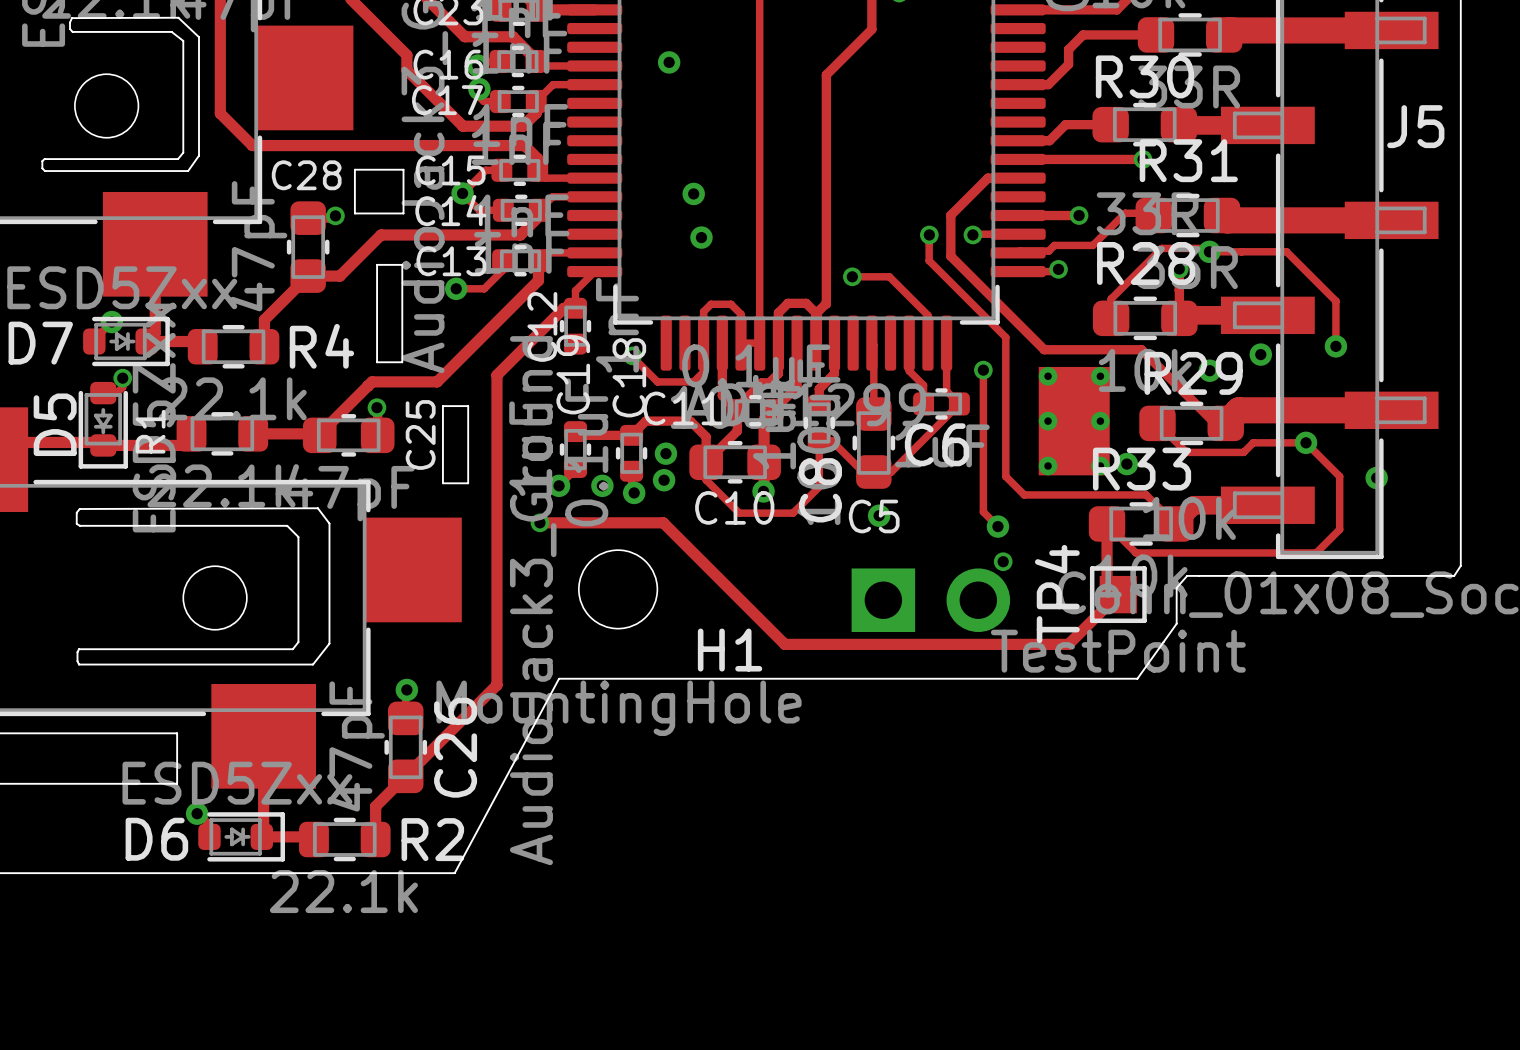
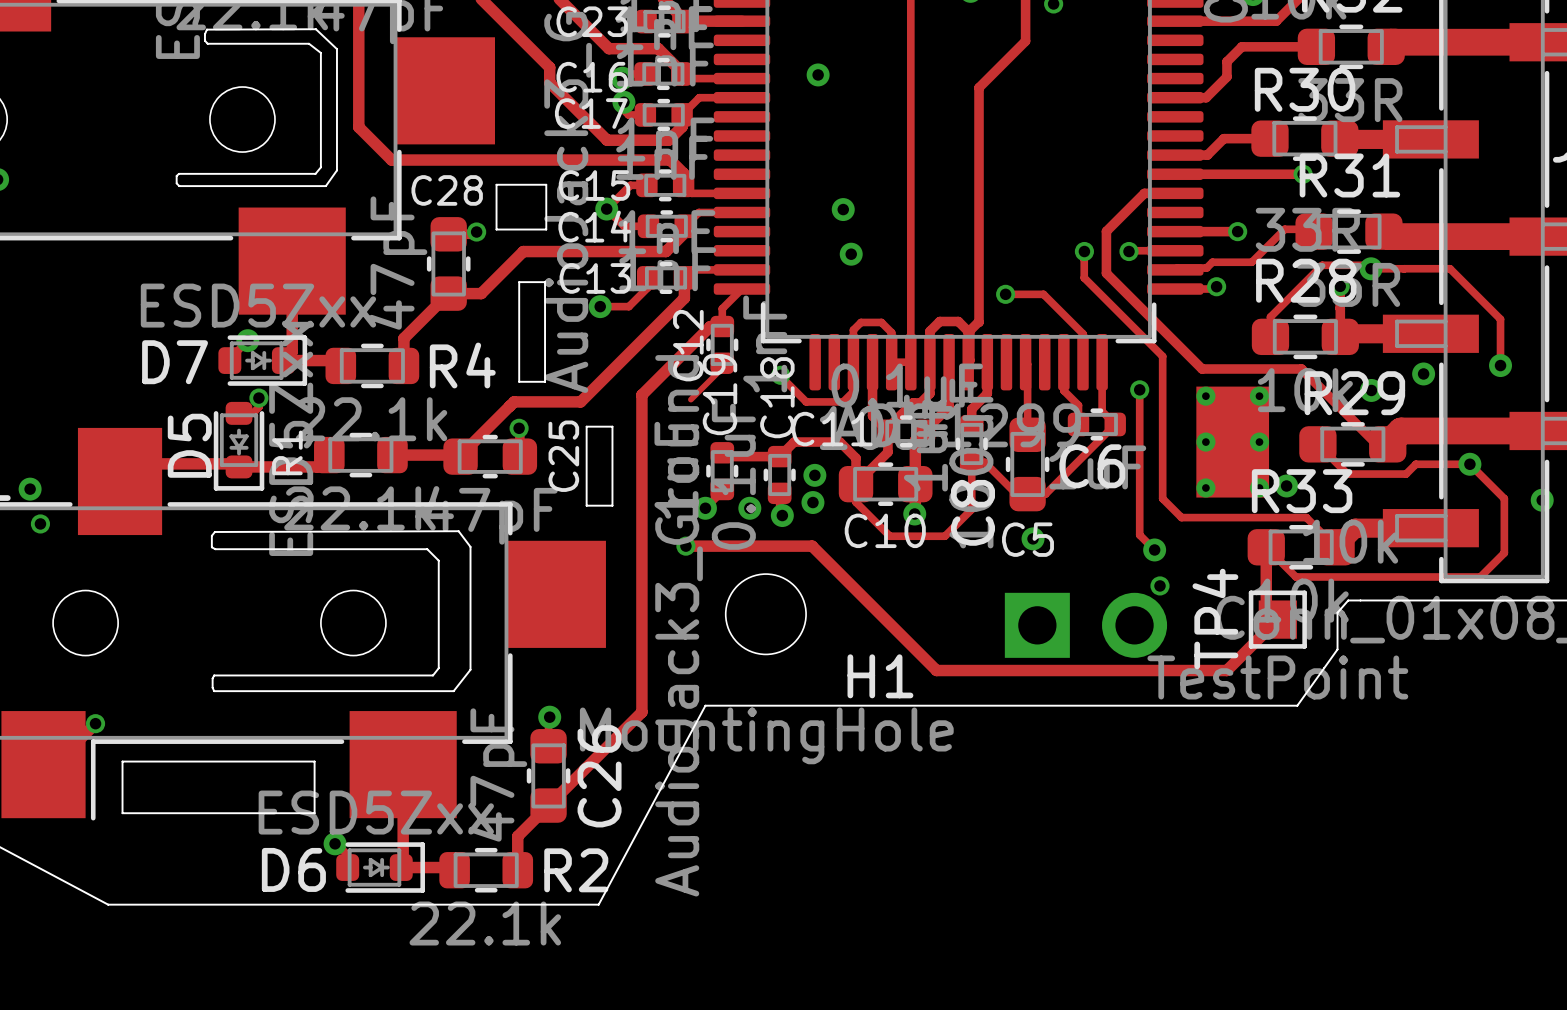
track: none -> (722, 363) (722, 368) (690, 399)

